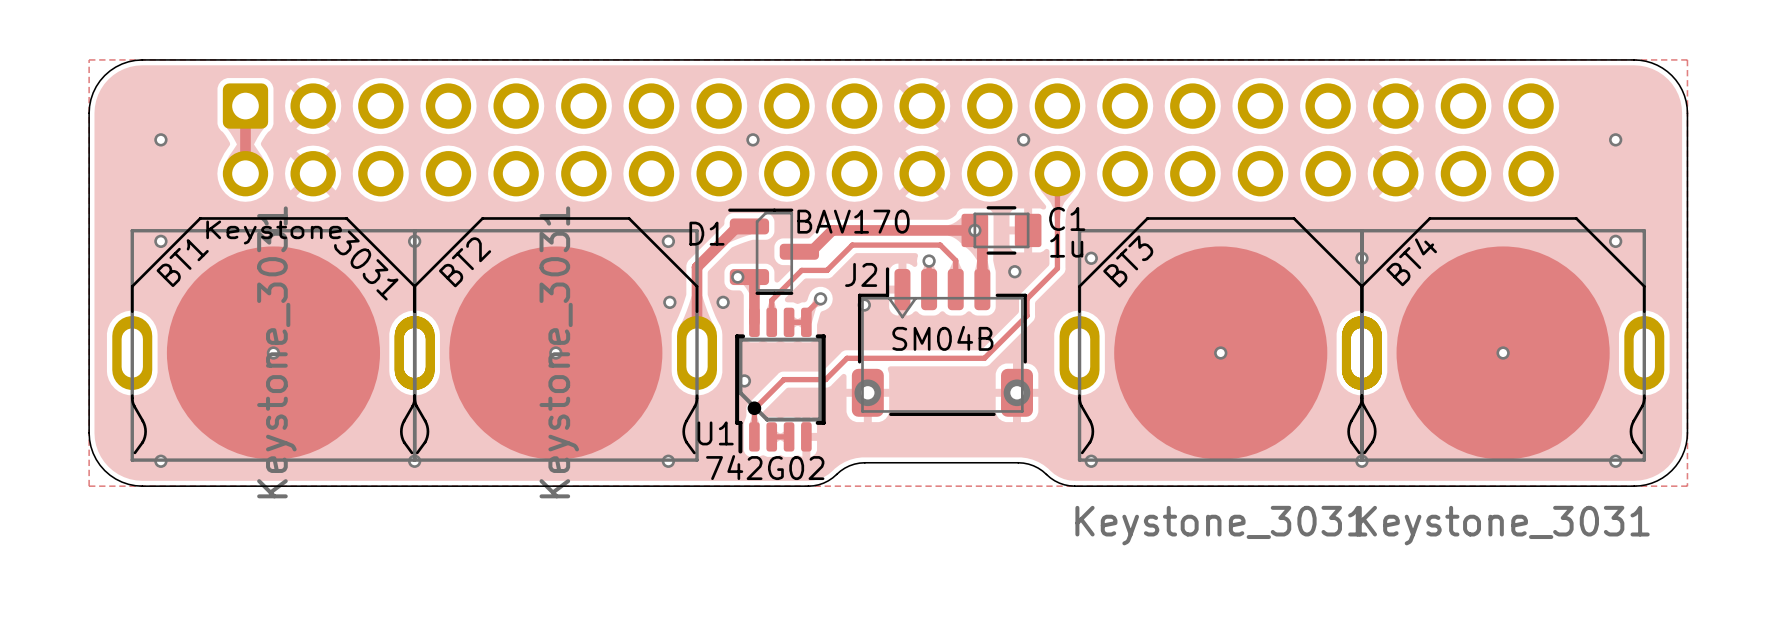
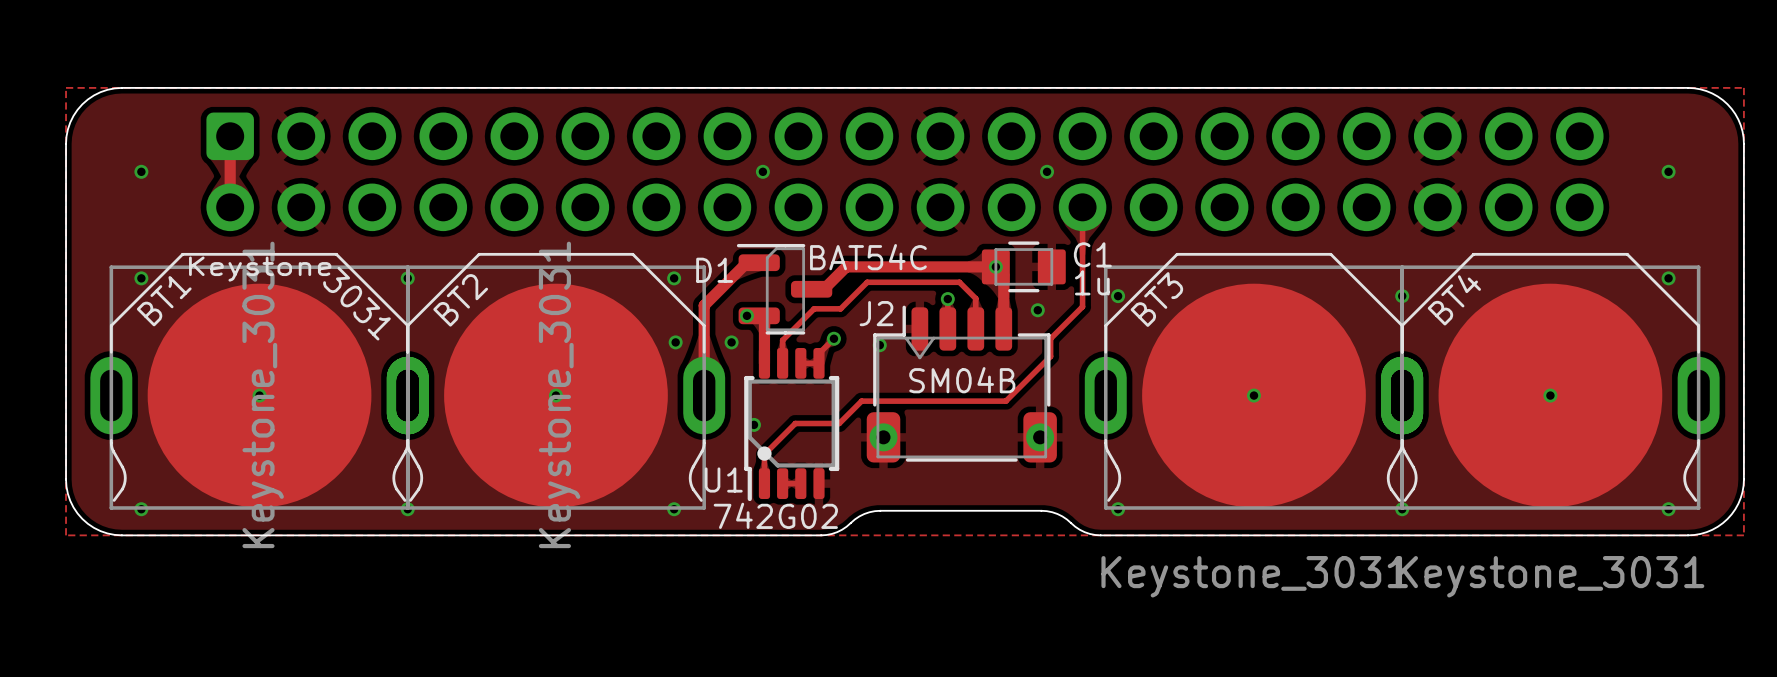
D1 value: BAV170 (853, 221) -> BAT54C (868, 257)

